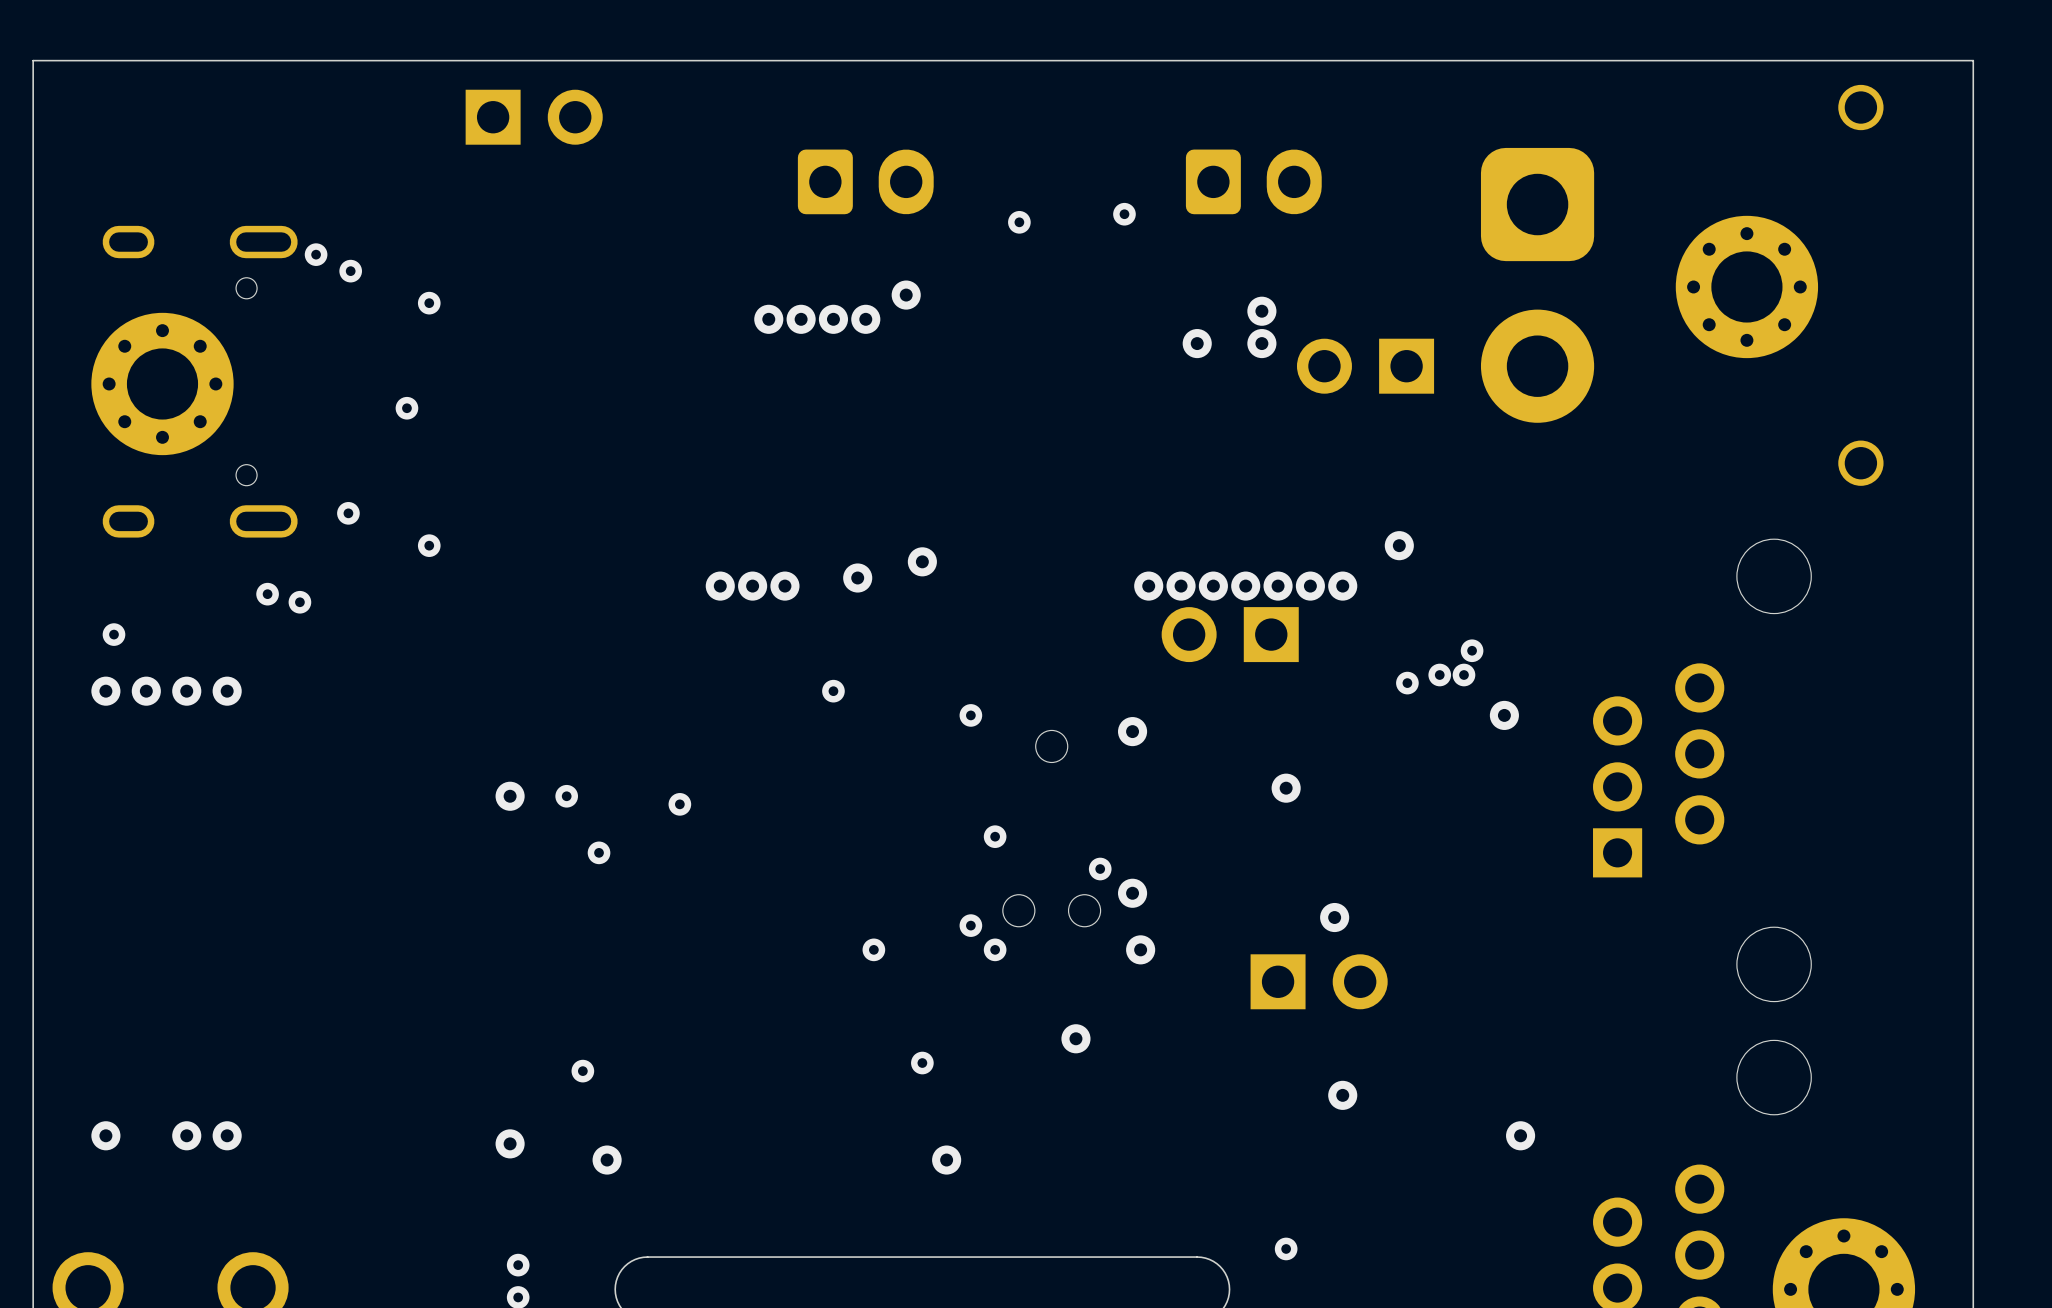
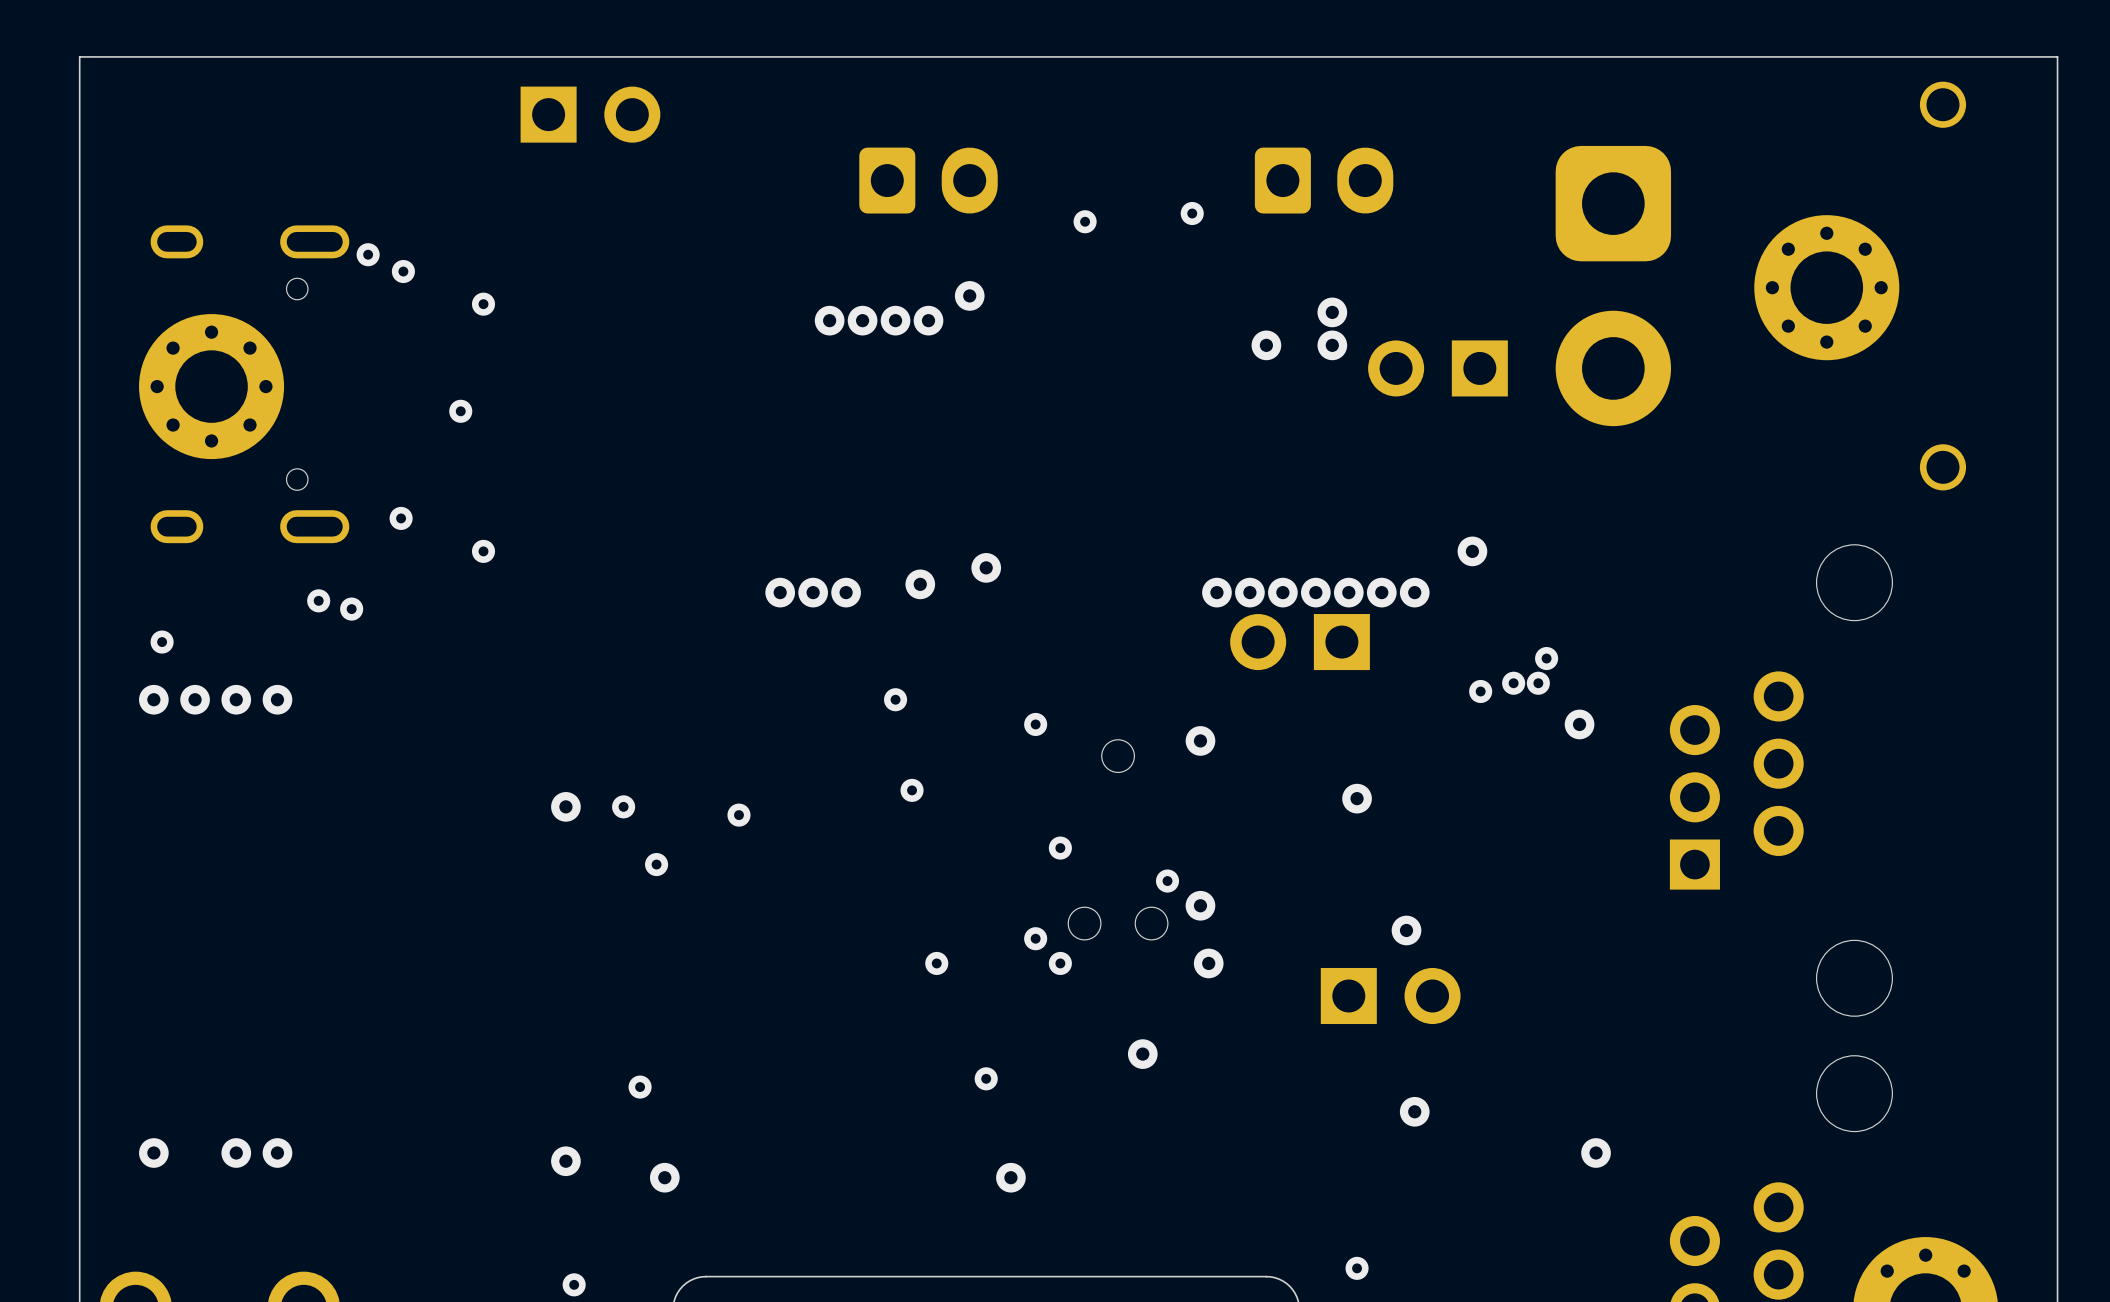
via: none -> (912, 790)

